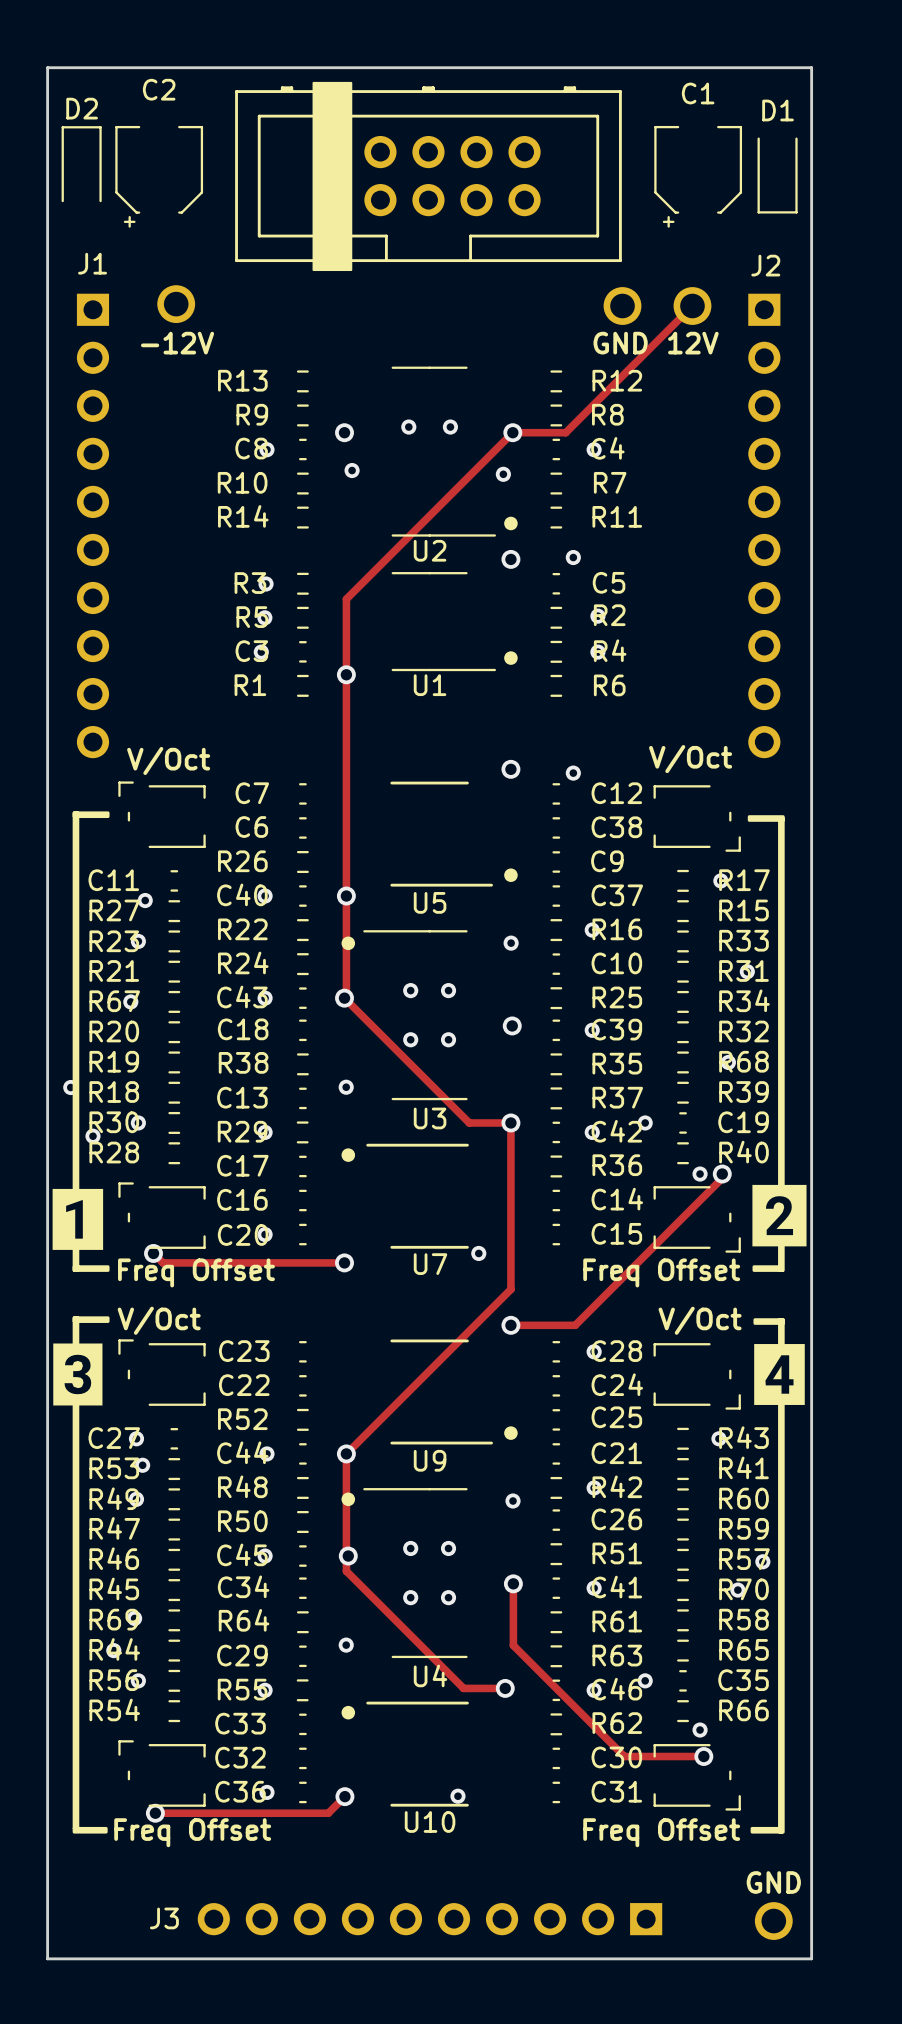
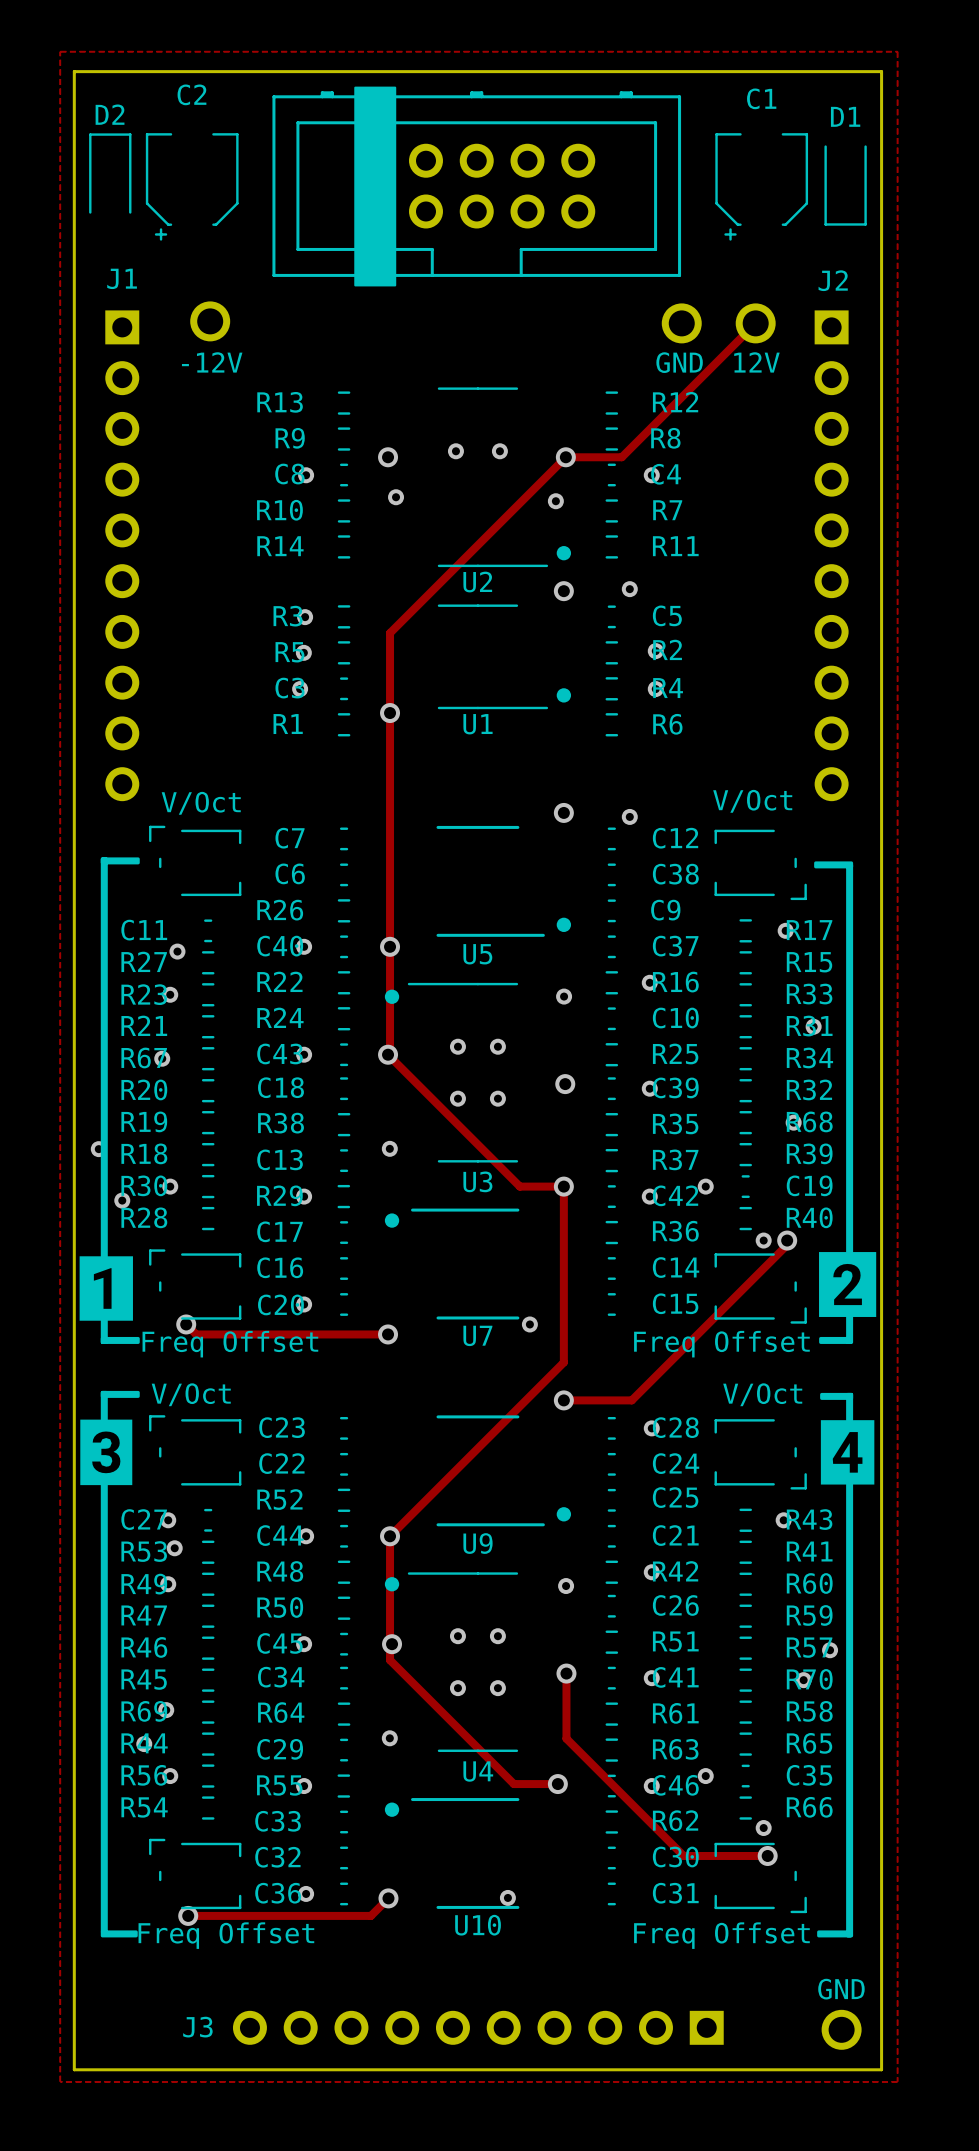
zone outline: none -> (60, 51) (60, 2081) (897, 2081) (897, 51) (60, 51)

